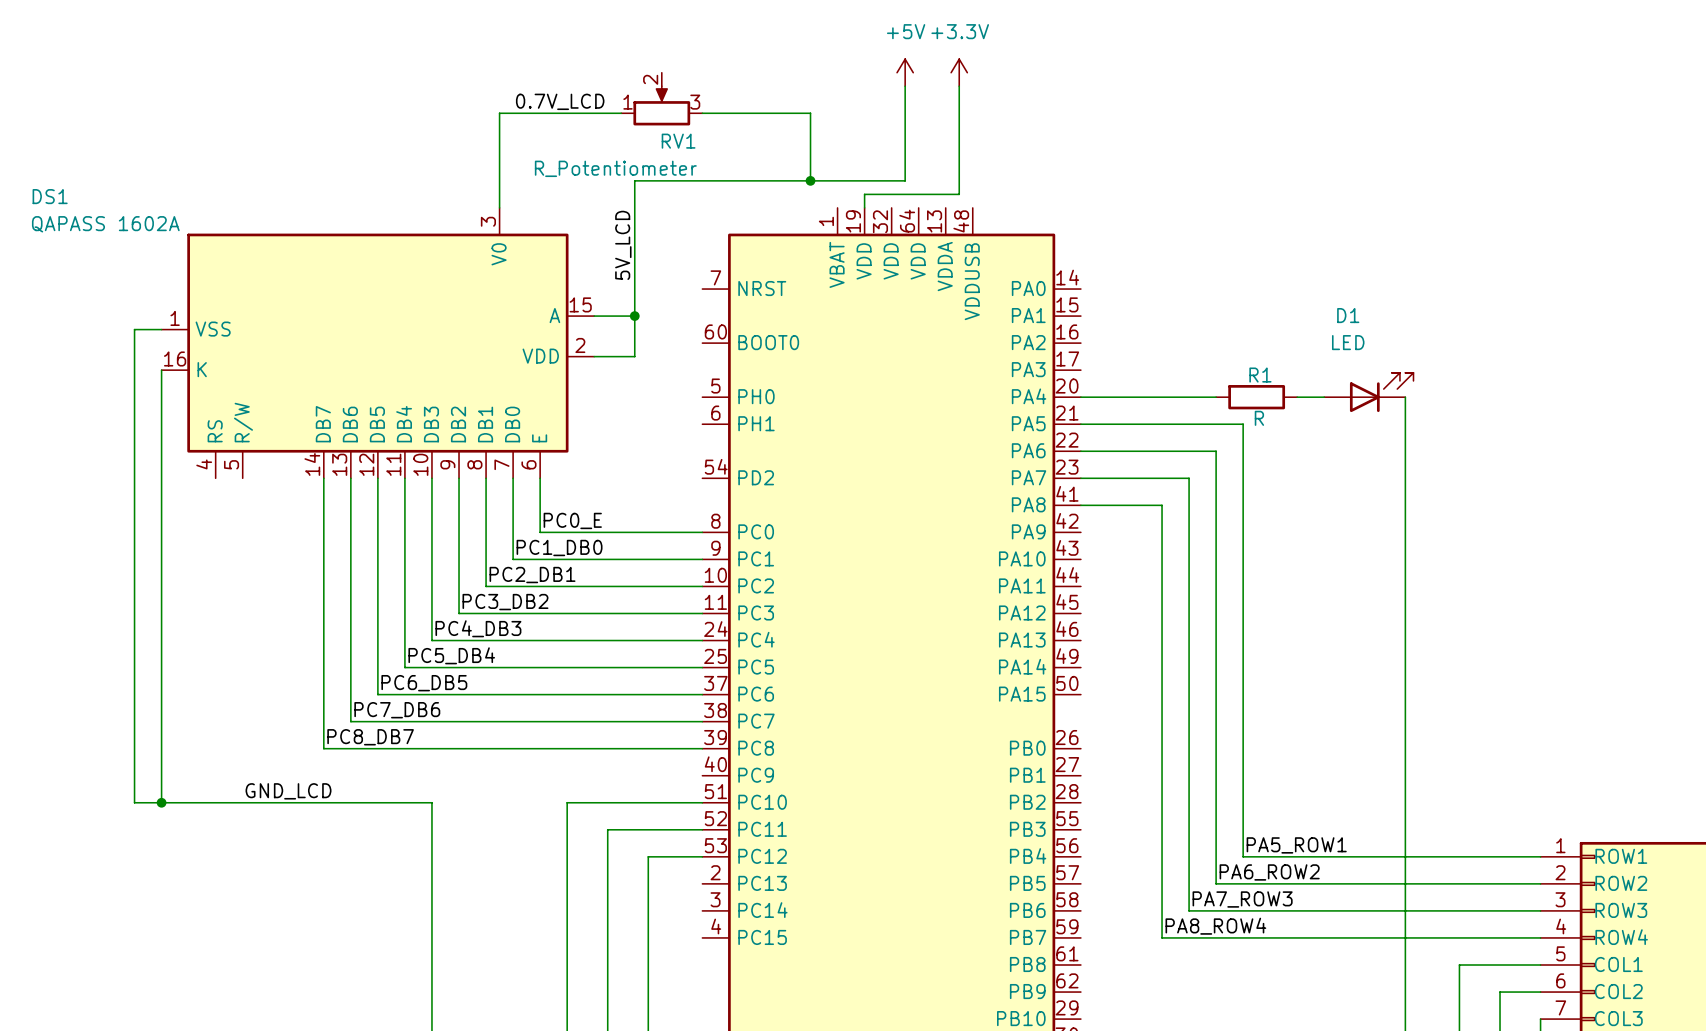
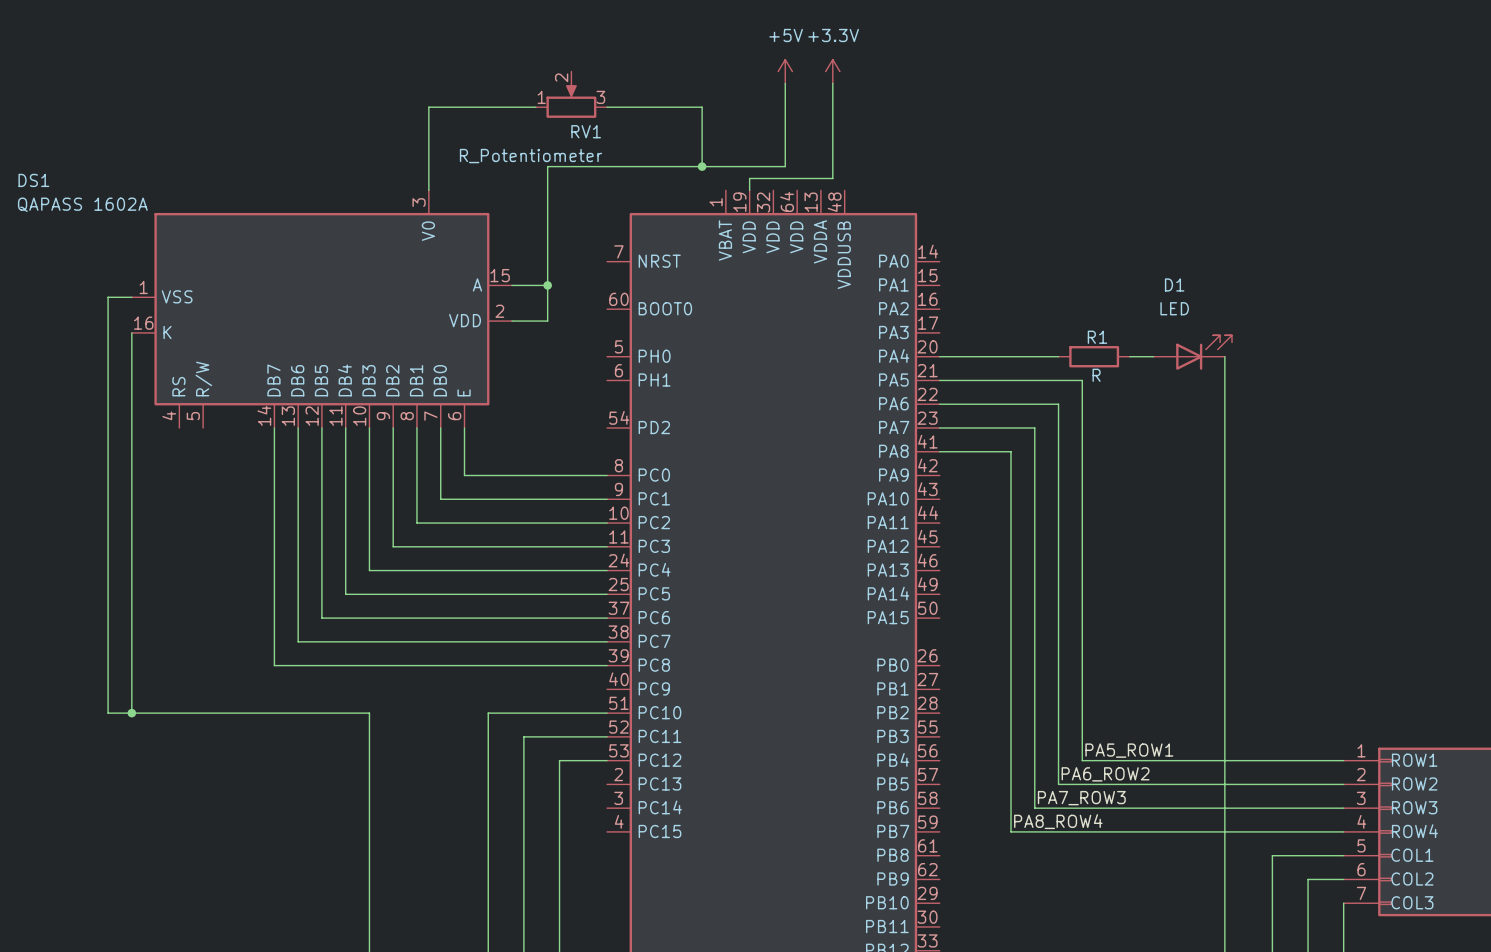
label: 0.7V_LCD (560, 101) -> none
label: 5V_LCD (623, 245) -> none
label: PC0_E (572, 520) -> none
label: PC1_DB0 (559, 547) -> none
label: PC2_DB1 (532, 575) -> none
label: PC3_DB2 (505, 602) -> none
label: PC4_DB3 (478, 628) -> none
label: PC5_DB4 (451, 655) -> none
label: PC6_DB5 (424, 683) -> none
label: PC7_DB6 (397, 710) -> none
label: PC8_DB7 (370, 737) -> none
label: GND_LCD (288, 791) -> none

